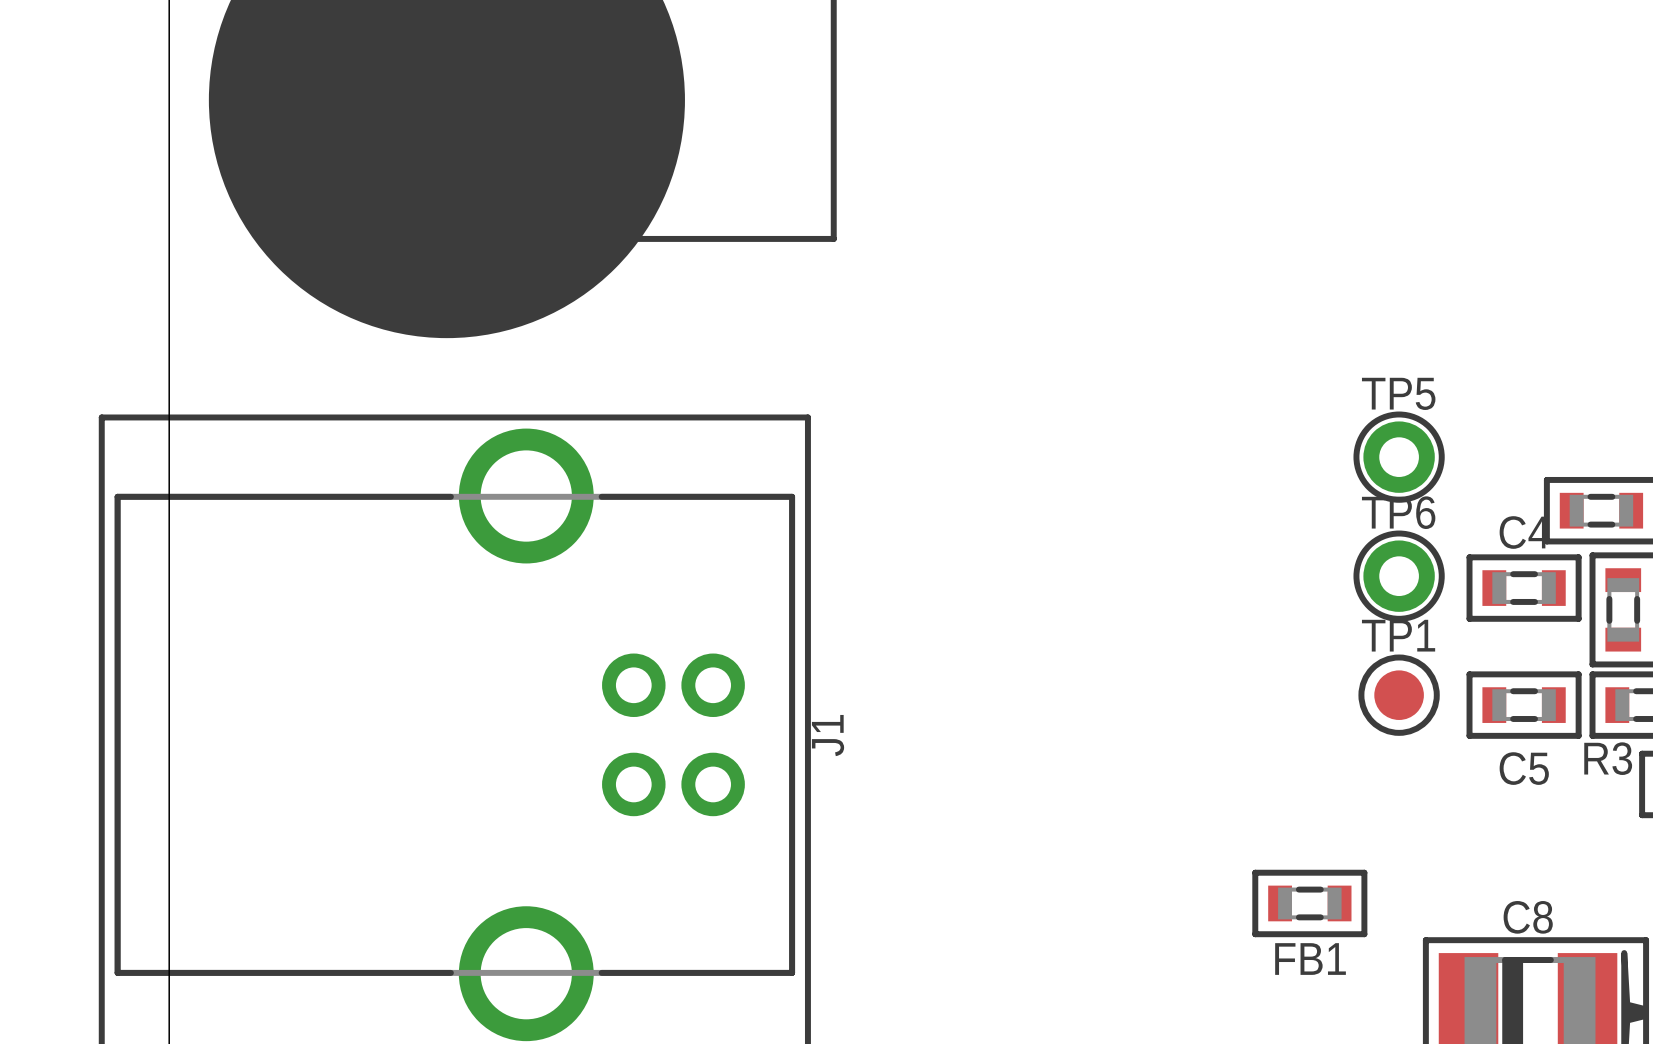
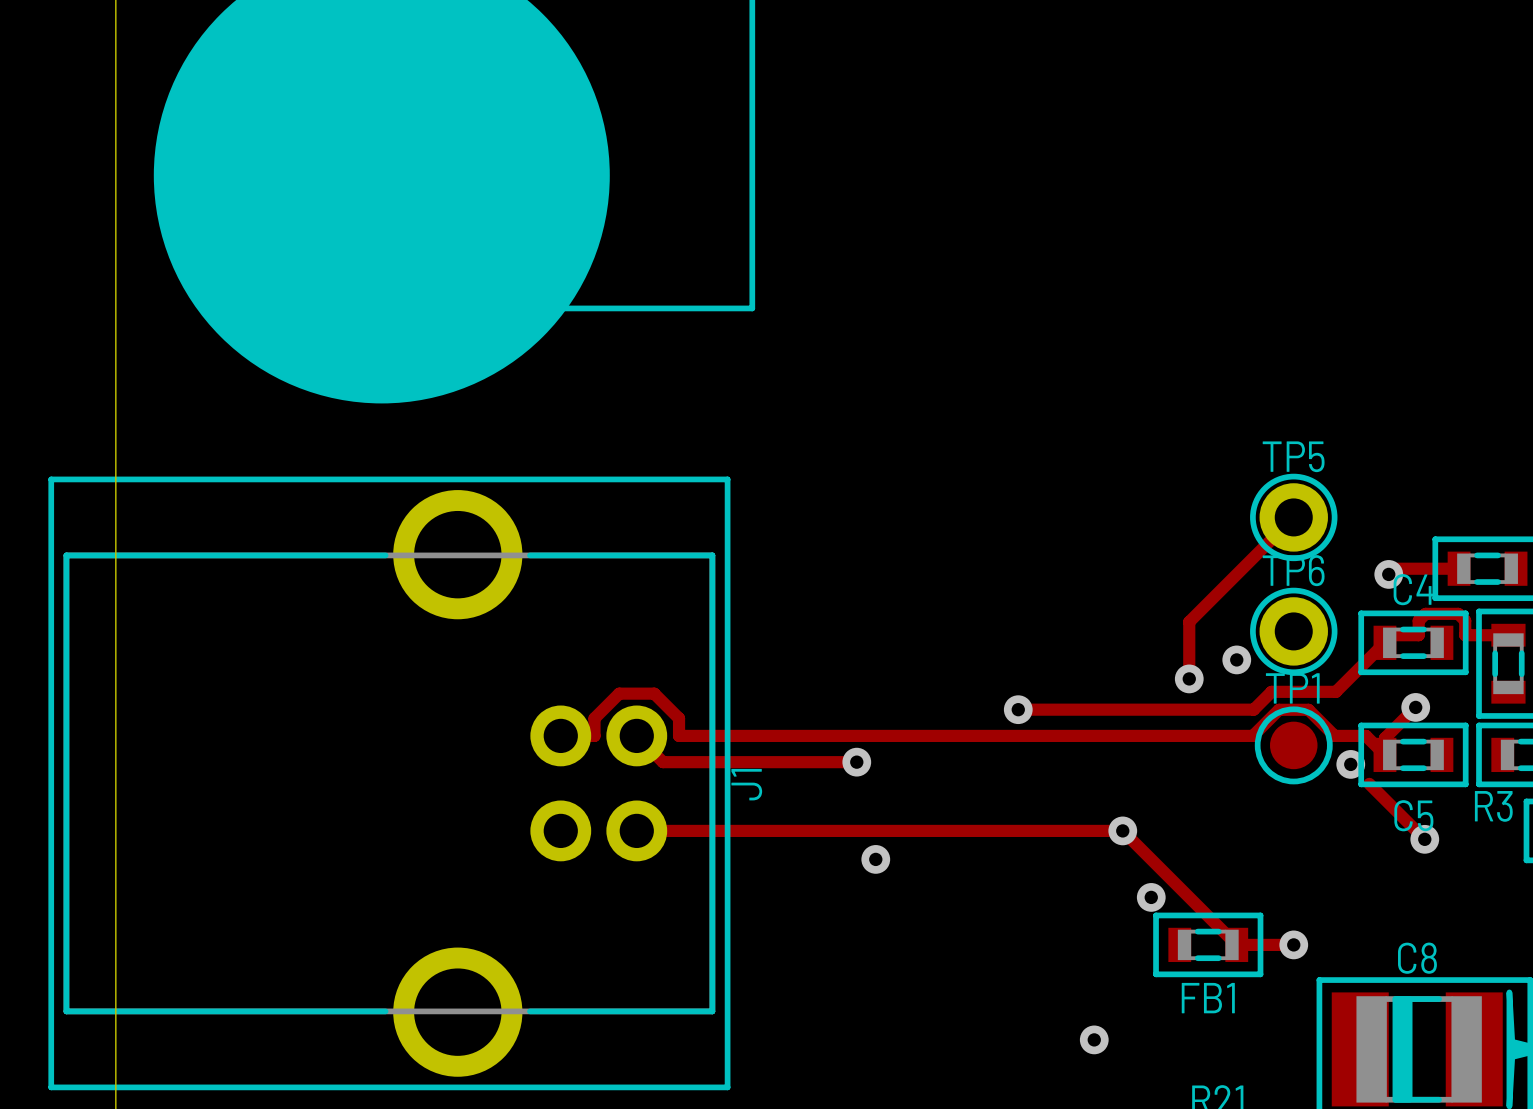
track: none -> (1293, 517) (1189, 621) (1189, 678)
track: none -> (1459, 568) (1394, 568) (1388, 574)
via: none -> (1388, 574)
track: none -> (1508, 635) (1465, 635) (1465, 620) (1458, 613) (1425, 613) (1418, 620) (1418, 635) (1392, 635) (1335, 691) (1271, 691) (1253, 709) (1018, 709)
via: none -> (1236, 659)
via: none -> (1189, 678)
track: none -> (1415, 707) (1384, 738) (1384, 754) (1365, 735) (1334, 735) (1308, 709) (1279, 709) (1252, 735) (679, 735) (679, 718) (654, 693) (619, 693) (594, 718) (594, 735) (560, 735)
via: none -> (1415, 707)
via: none -> (1018, 709)
track: none -> (636, 735) (663, 762) (856, 762)
via: none -> (856, 762)
via: none -> (1350, 764)
track: none -> (1369, 783) (1424, 839)
track: none -> (636, 830) (1122, 830) (1236, 944) (1293, 944)
via: none -> (1122, 830)
via: none -> (1424, 839)
via: none -> (875, 859)
via: none -> (1151, 897)
via: none -> (1293, 944)
via: none -> (1094, 1039)

